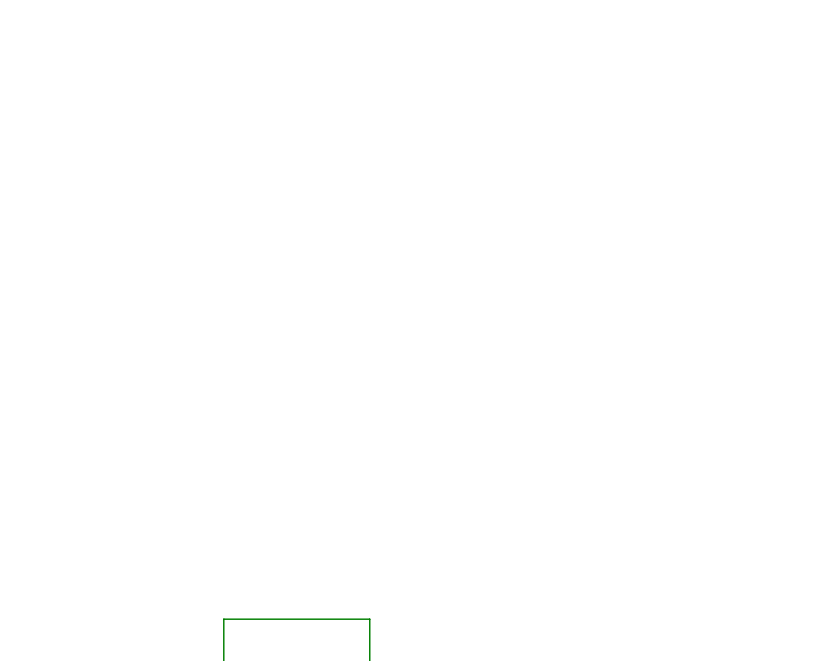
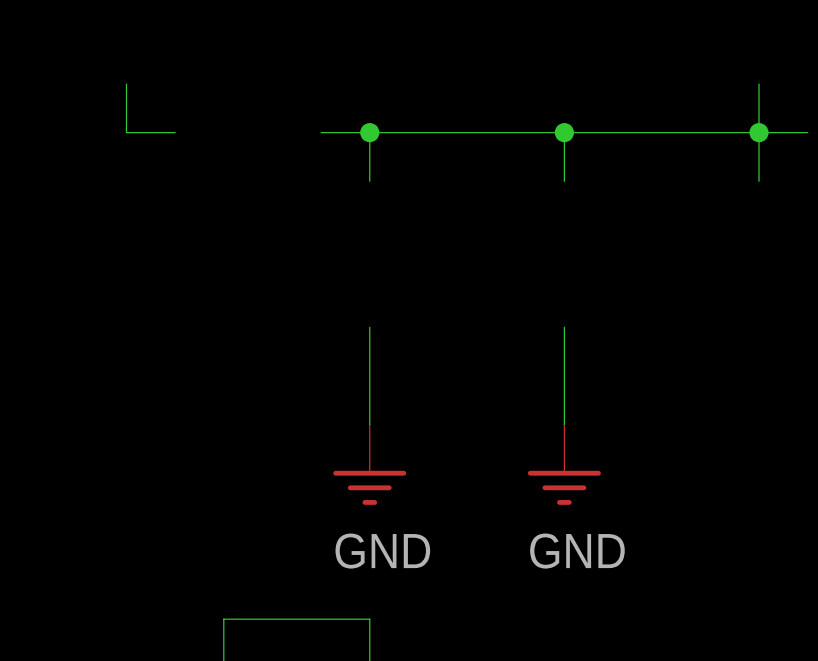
wire: none -> (126, 83) (126, 132) (175, 132)
wire: none -> (759, 83) (759, 181)
wire: none -> (321, 132) (807, 132)
wire: none -> (369, 132) (369, 181)
junction: none -> (369, 132)
wire: none -> (564, 132) (564, 181)
junction: none -> (564, 132)
junction: none -> (759, 132)
wire: none -> (369, 327) (369, 424)
wire: none -> (564, 327) (564, 424)
power symbol: none -> GND (369, 464)
power symbol: none -> GND (564, 464)

